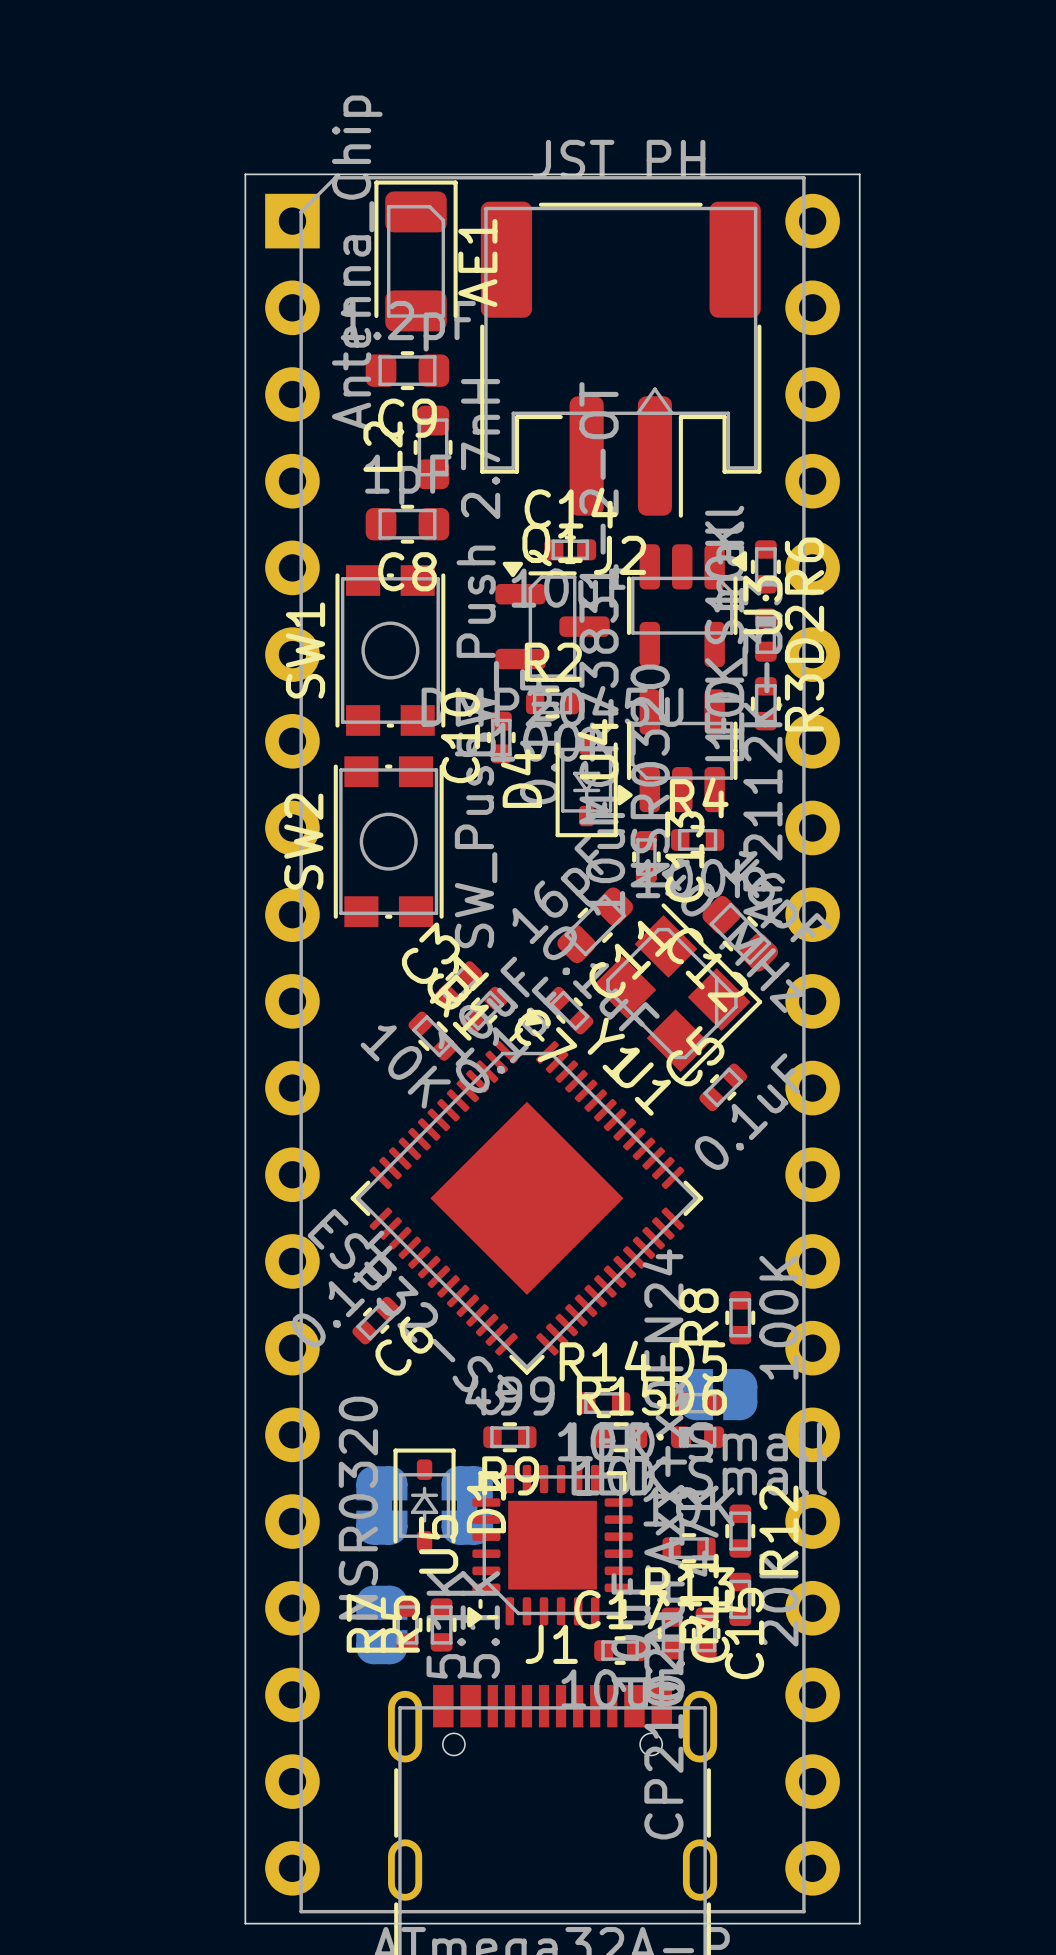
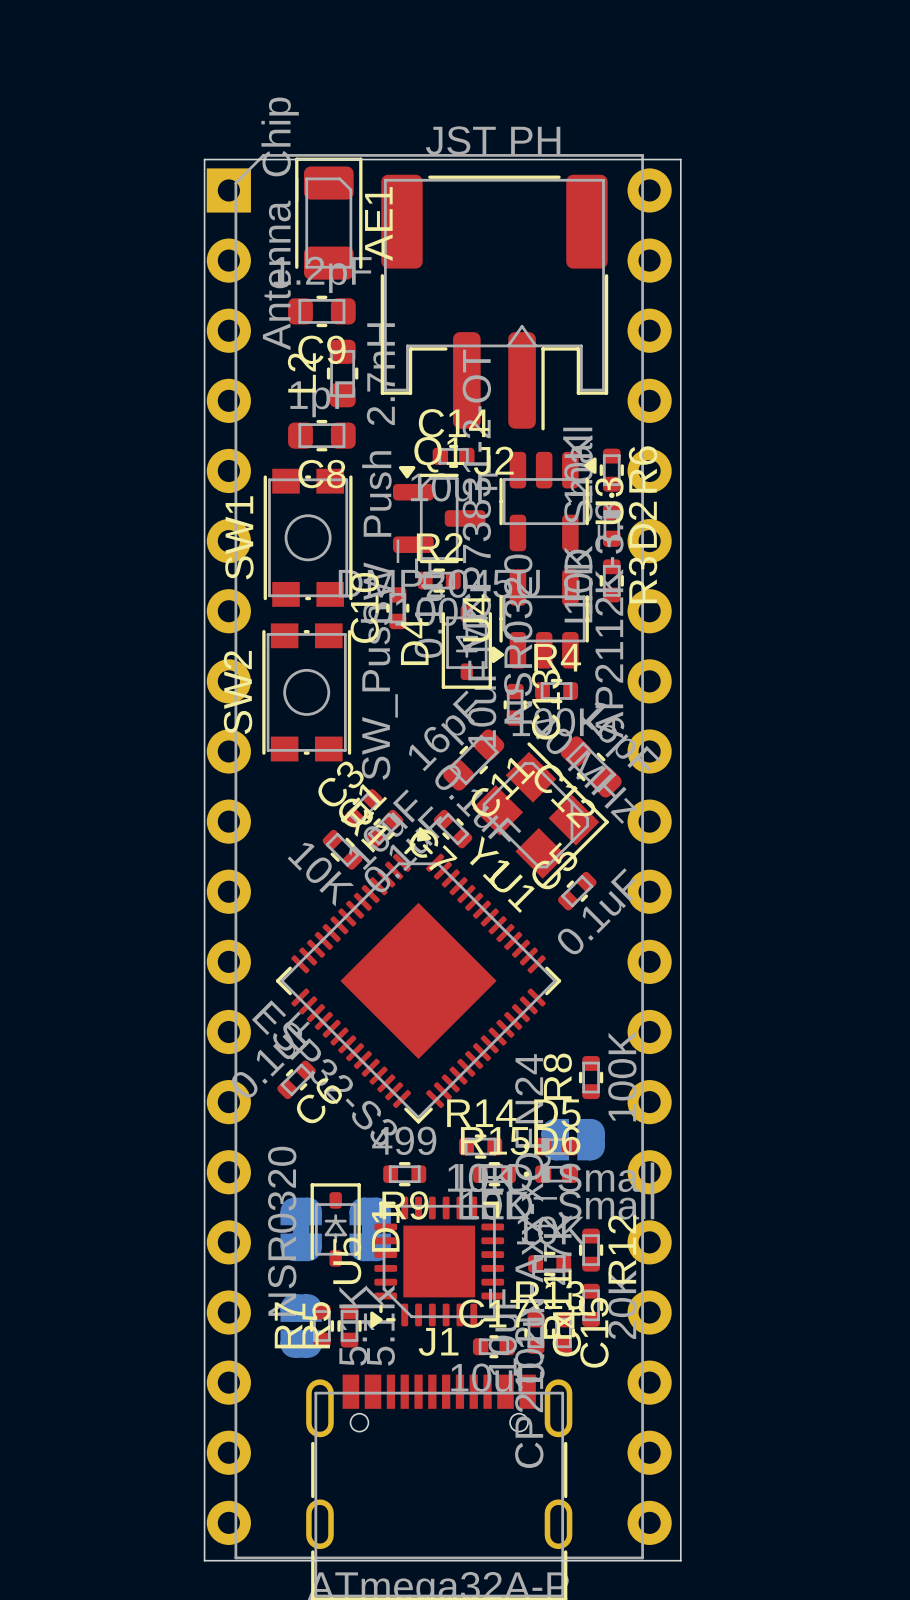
board edge: (245, 174) (859, 174) (859, 1923) (245, 1923) (245, 174) -> (204, 159) (204, 1560) (680, 1560) (680, 159) (204, 159)

